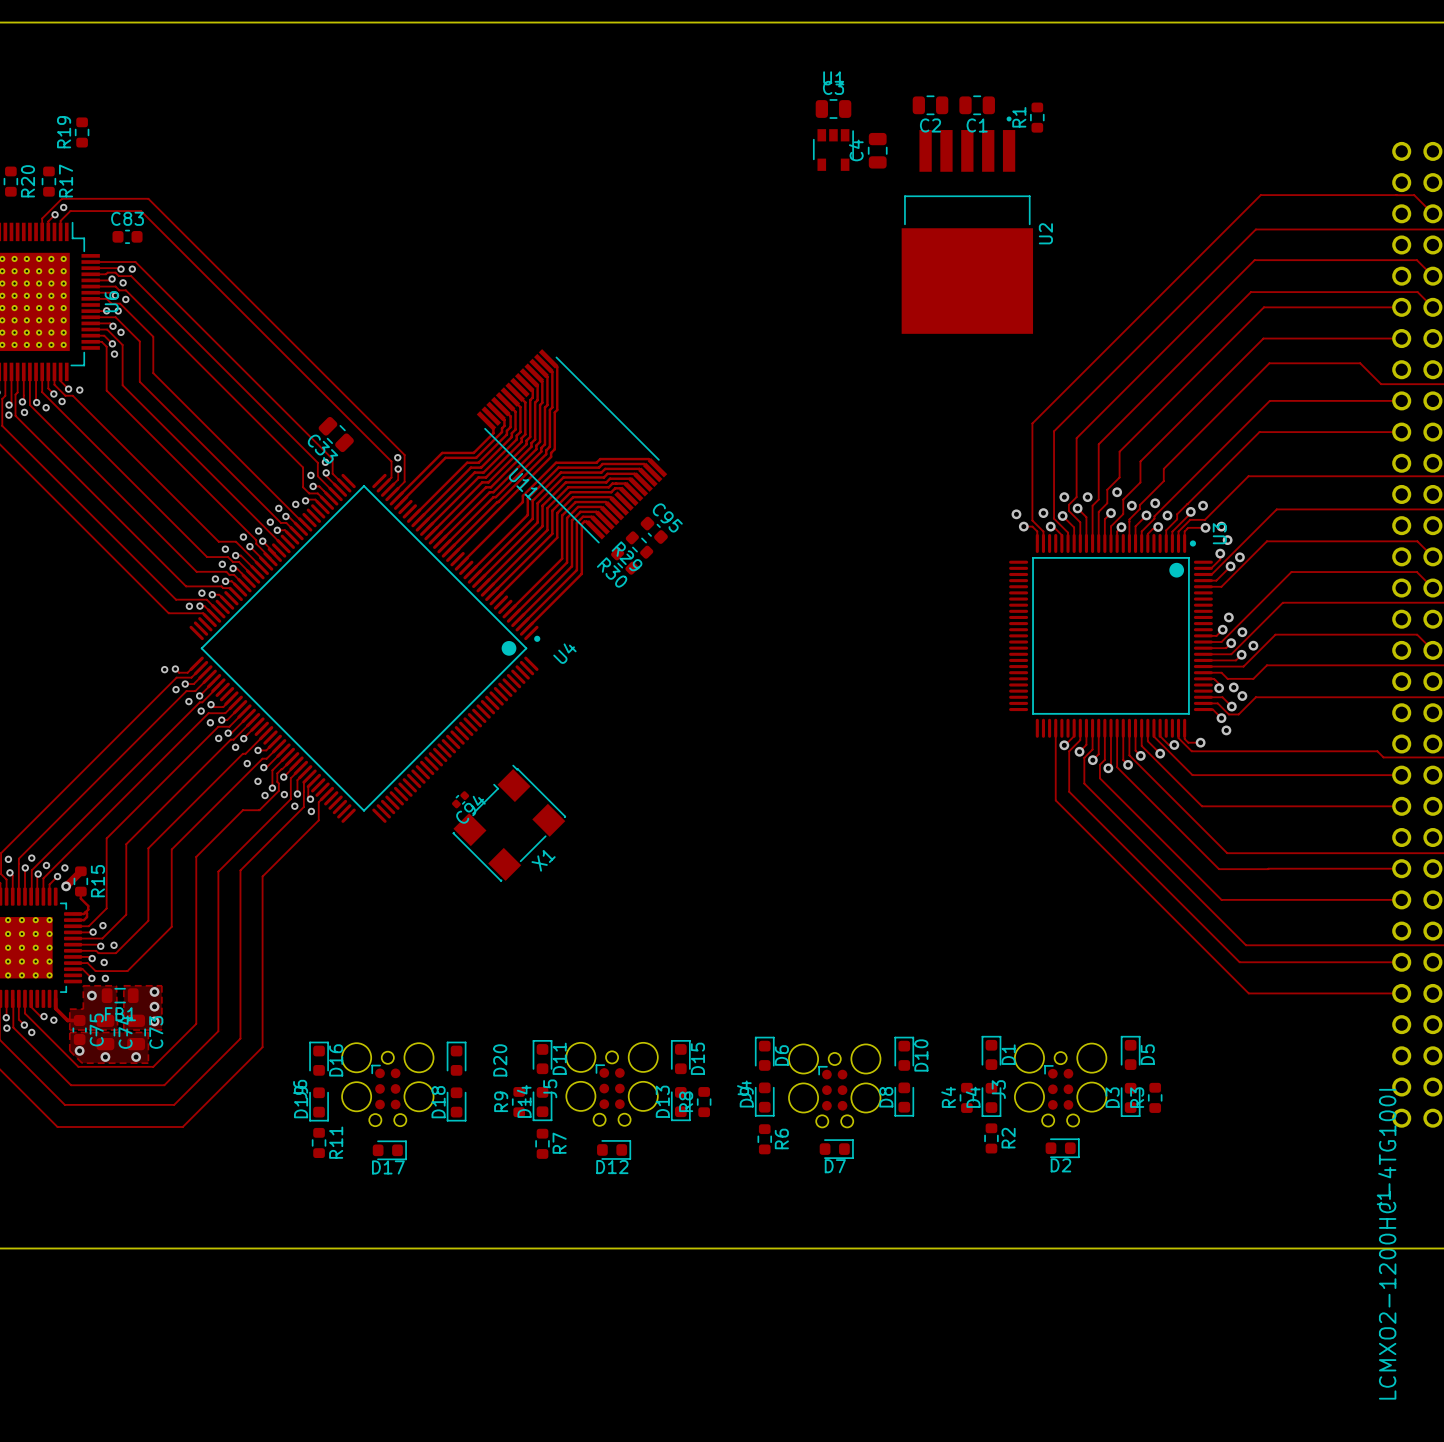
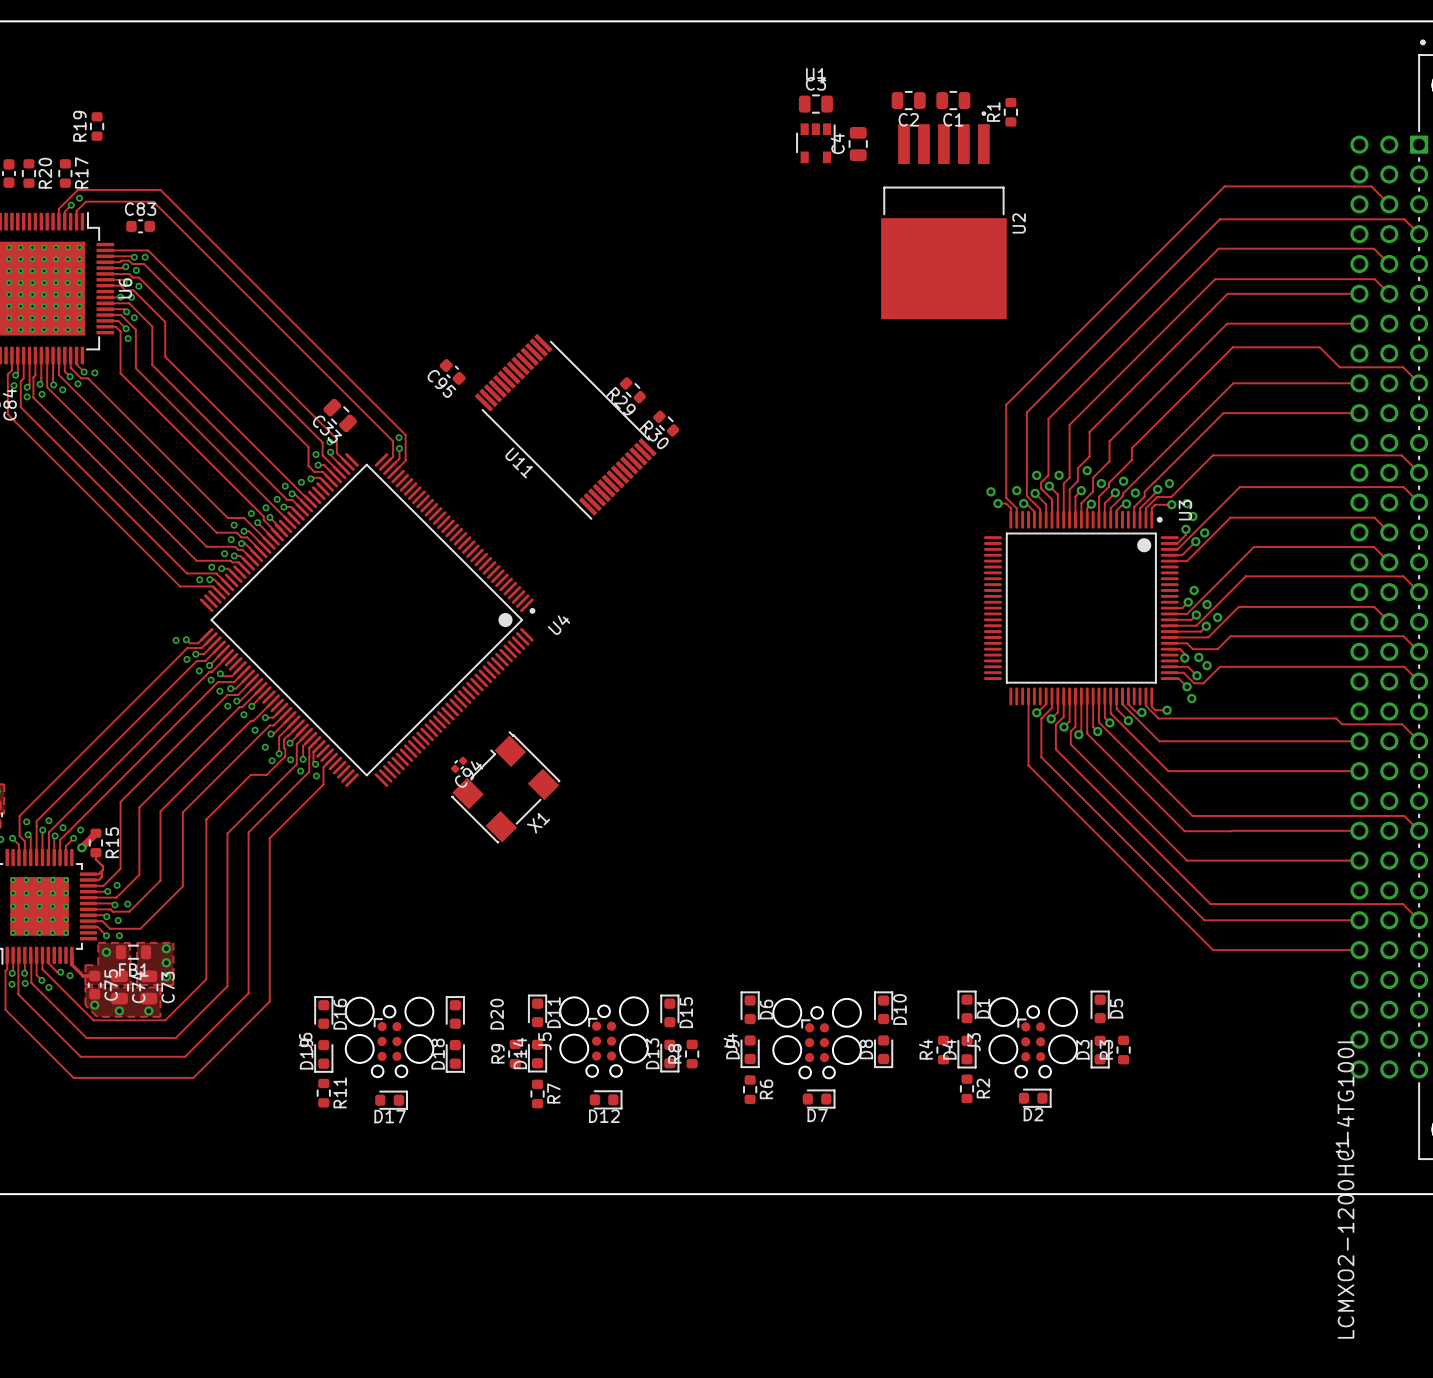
track: (548, 358) (557, 366) (554, 449) (551, 452) (551, 456) (453, 554) -> none
track: (543, 363) (552, 371) (549, 446) (546, 450) (546, 454) (448, 550) -> none
track: (539, 368) (547, 376) (544, 444) (541, 448) (541, 451) (444, 546) -> none
track: (534, 373) (542, 381) (540, 441) (536, 445) (536, 449) (440, 541) -> none
track: (529, 377) (537, 386) (537, 400) (535, 402) (535, 439) (531, 443) (531, 446) (490, 487) (485, 487) (435, 537) -> none
track: (524, 382) (532, 390) (532, 397) (530, 400) (530, 436) (526, 440) (526, 444) (488, 482) (482, 482) (431, 533) -> none
track: (515, 392) (525, 402) (525, 434) (521, 438) (521, 441) (486, 477) (478, 477) (427, 528) -> none
track: (510, 397) (520, 407) (520, 432) (516, 435) (516, 439) (483, 472) (474, 472) (422, 524) -> none
track: (505, 401) (515, 411) (515, 429) (511, 433) (511, 436) (481, 467) (470, 467) (418, 520) -> none
track: (500, 406) (510, 416) (510, 427) (506, 430) (506, 434) (478, 462) (467, 462) (414, 515) -> none
track: (496, 411) (504, 419) (502, 432) (476, 457) (445, 457) (401, 502) -> none
track: (486, 420) (493, 428) (493, 433) (473, 452) (442, 452) (396, 498) -> none
track: (657, 467) (648, 459) (600, 459) (596, 462) (556, 462) (522, 495) (522, 502) (461, 563) -> none
track: (652, 472) (644, 463) (602, 463) (599, 467) (558, 467) (527, 498) (527, 514) (470, 572) -> none
track: (647, 477) (639, 468) (605, 468) (601, 472) (560, 472) (532, 500) (532, 518) (474, 576) -> none
track: (643, 482) (634, 473) (607, 473) (603, 477) (563, 477) (537, 503) (537, 522) (479, 580) -> none
track: (616, 483) (625, 483) (633, 491) -> none
track: (616, 483) (612, 483) (608, 487) (568, 487) (547, 508) (547, 530) (487, 589) -> none
track: (638, 486) (630, 478) (610, 478) (606, 482) (565, 482) (542, 505) (542, 526) (483, 585) -> none
track: (628, 496) (620, 488) (615, 488) (611, 492) (570, 492) (552, 510) (552, 533) (492, 593) -> none
track: (619, 505) (610, 497) (573, 497) (557, 513) (557, 537) (496, 598) -> none
track: (614, 510) (605, 502) (575, 502) (562, 515) (562, 558) (509, 611) -> none
track: (609, 515) (601, 506) (578, 506) (567, 518) (567, 562) (514, 615) -> none
C95 name position: C95 (667, 517) -> C95 (441, 383)
track: (604, 520) (596, 511) (580, 511) (571, 520) (571, 566) (518, 619) -> none
track: (600, 525) (591, 516) (583, 516) (576, 522) (576, 570) (522, 624) -> none
track: (595, 529) (586, 521) (581, 524) (581, 573) (527, 628) -> none
C95 position: (654, 530) -> (452, 371)
R29 position: (639, 545) -> (633, 390)
R30 position: (624, 560) -> (666, 423)

